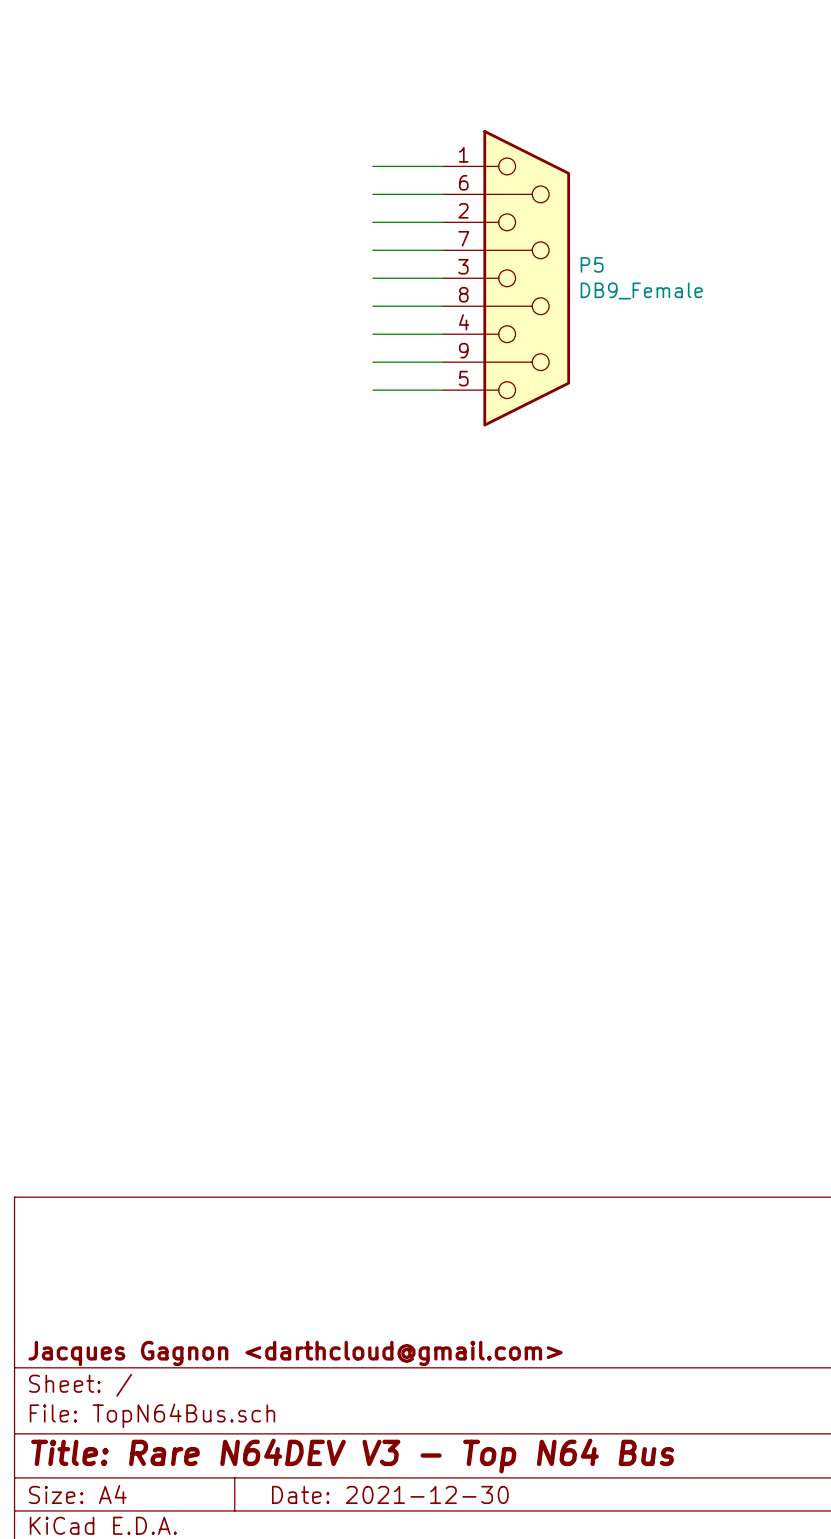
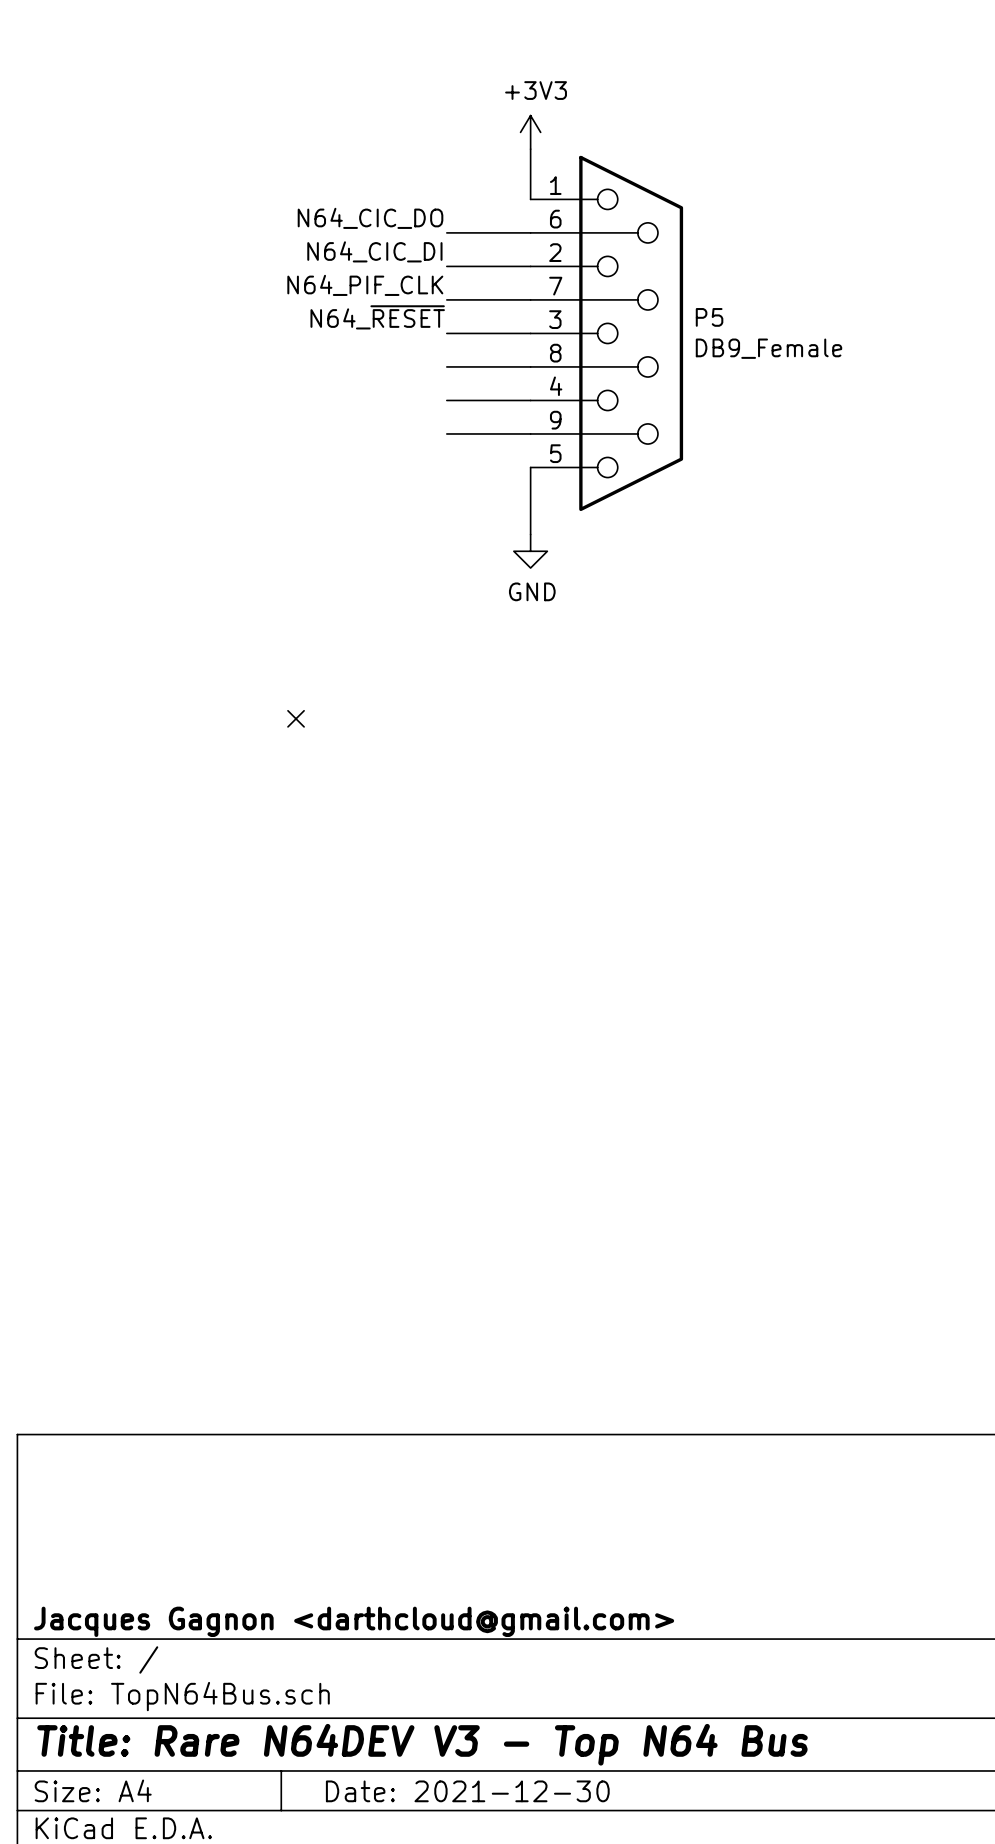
power symbol: none -> +3V3 (530, 132)
wire: (372, 166) (442, 166) -> (530, 149) (530, 199)
label: none -> N64_CIC_DO (370, 218)
label: none -> N64_CIC_DI (374, 251)
label: none -> N64_PIF_CLK (365, 285)
label: none -> N64_~{RESET} (377, 317)
wire: (372, 390) (442, 390) -> (530, 534) (530, 467)
power symbol: none -> GND (530, 551)
no-connect mark: none -> (296, 718)

